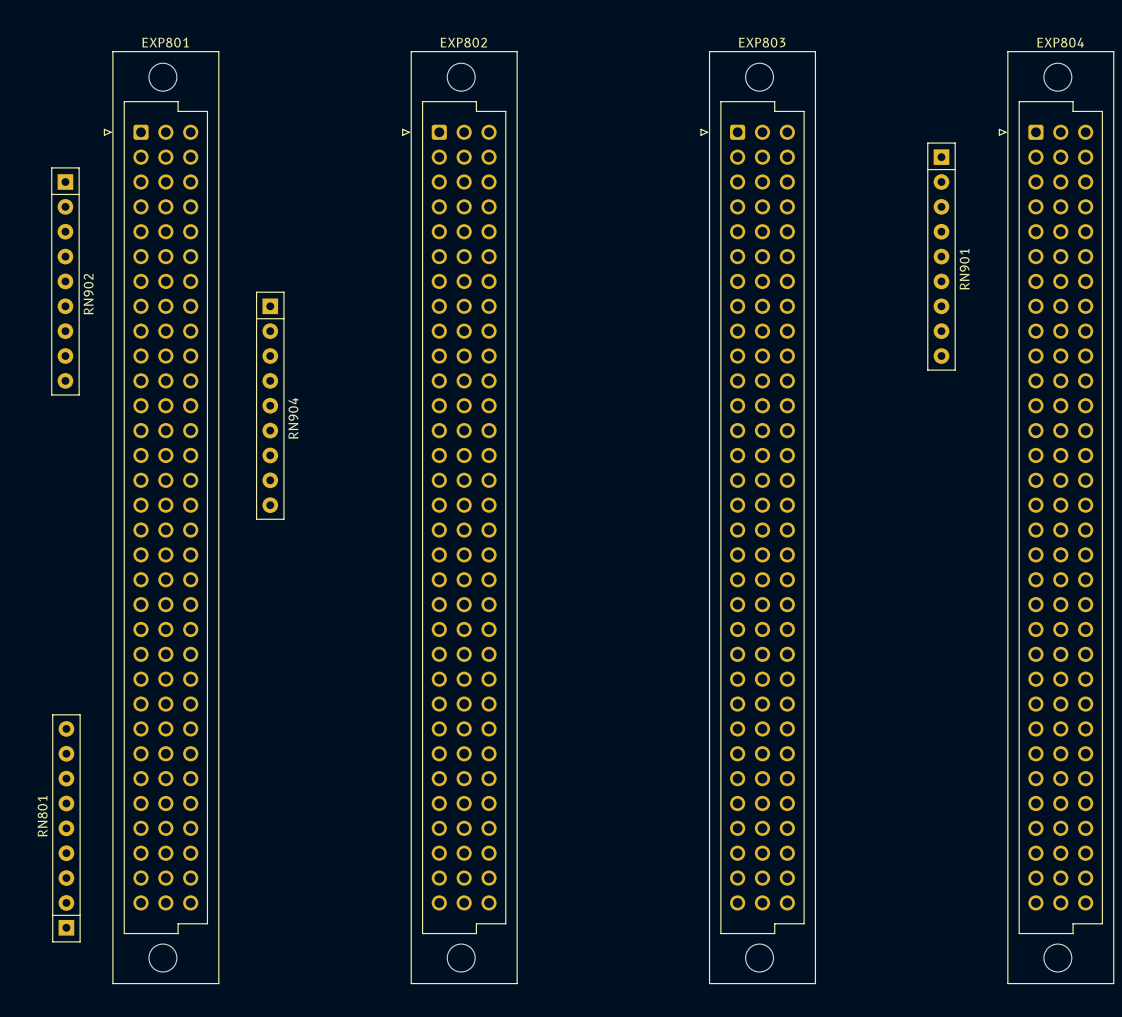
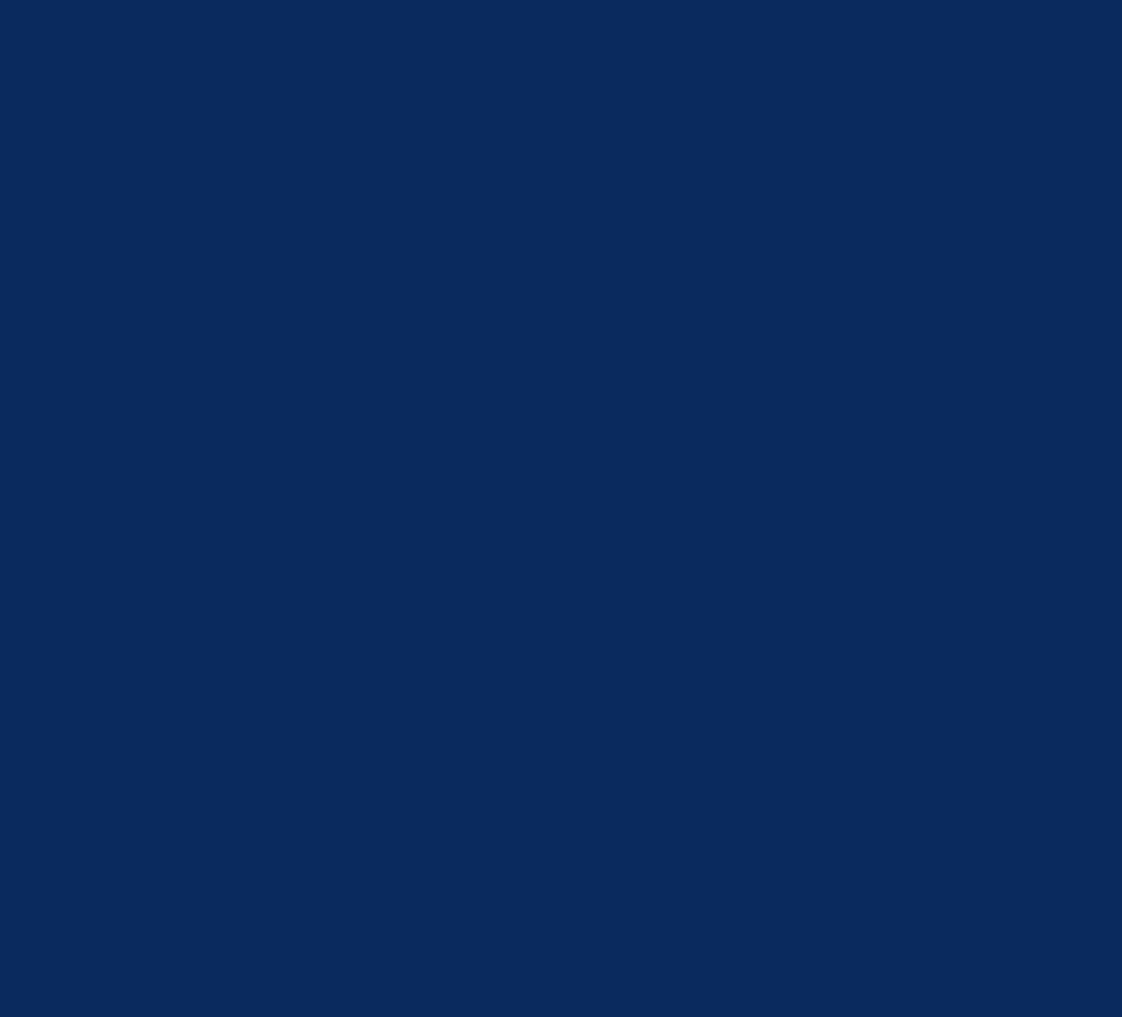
RN901: (941, 256) -> none
RN902: (65, 281) -> none
RN904: (270, 405) -> none
EXP801: (161, 517) -> none
EXP802: (459, 517) -> none
EXP803: (758, 517) -> none
EXP804: (1056, 517) -> none
RN801: (66, 828) -> none

